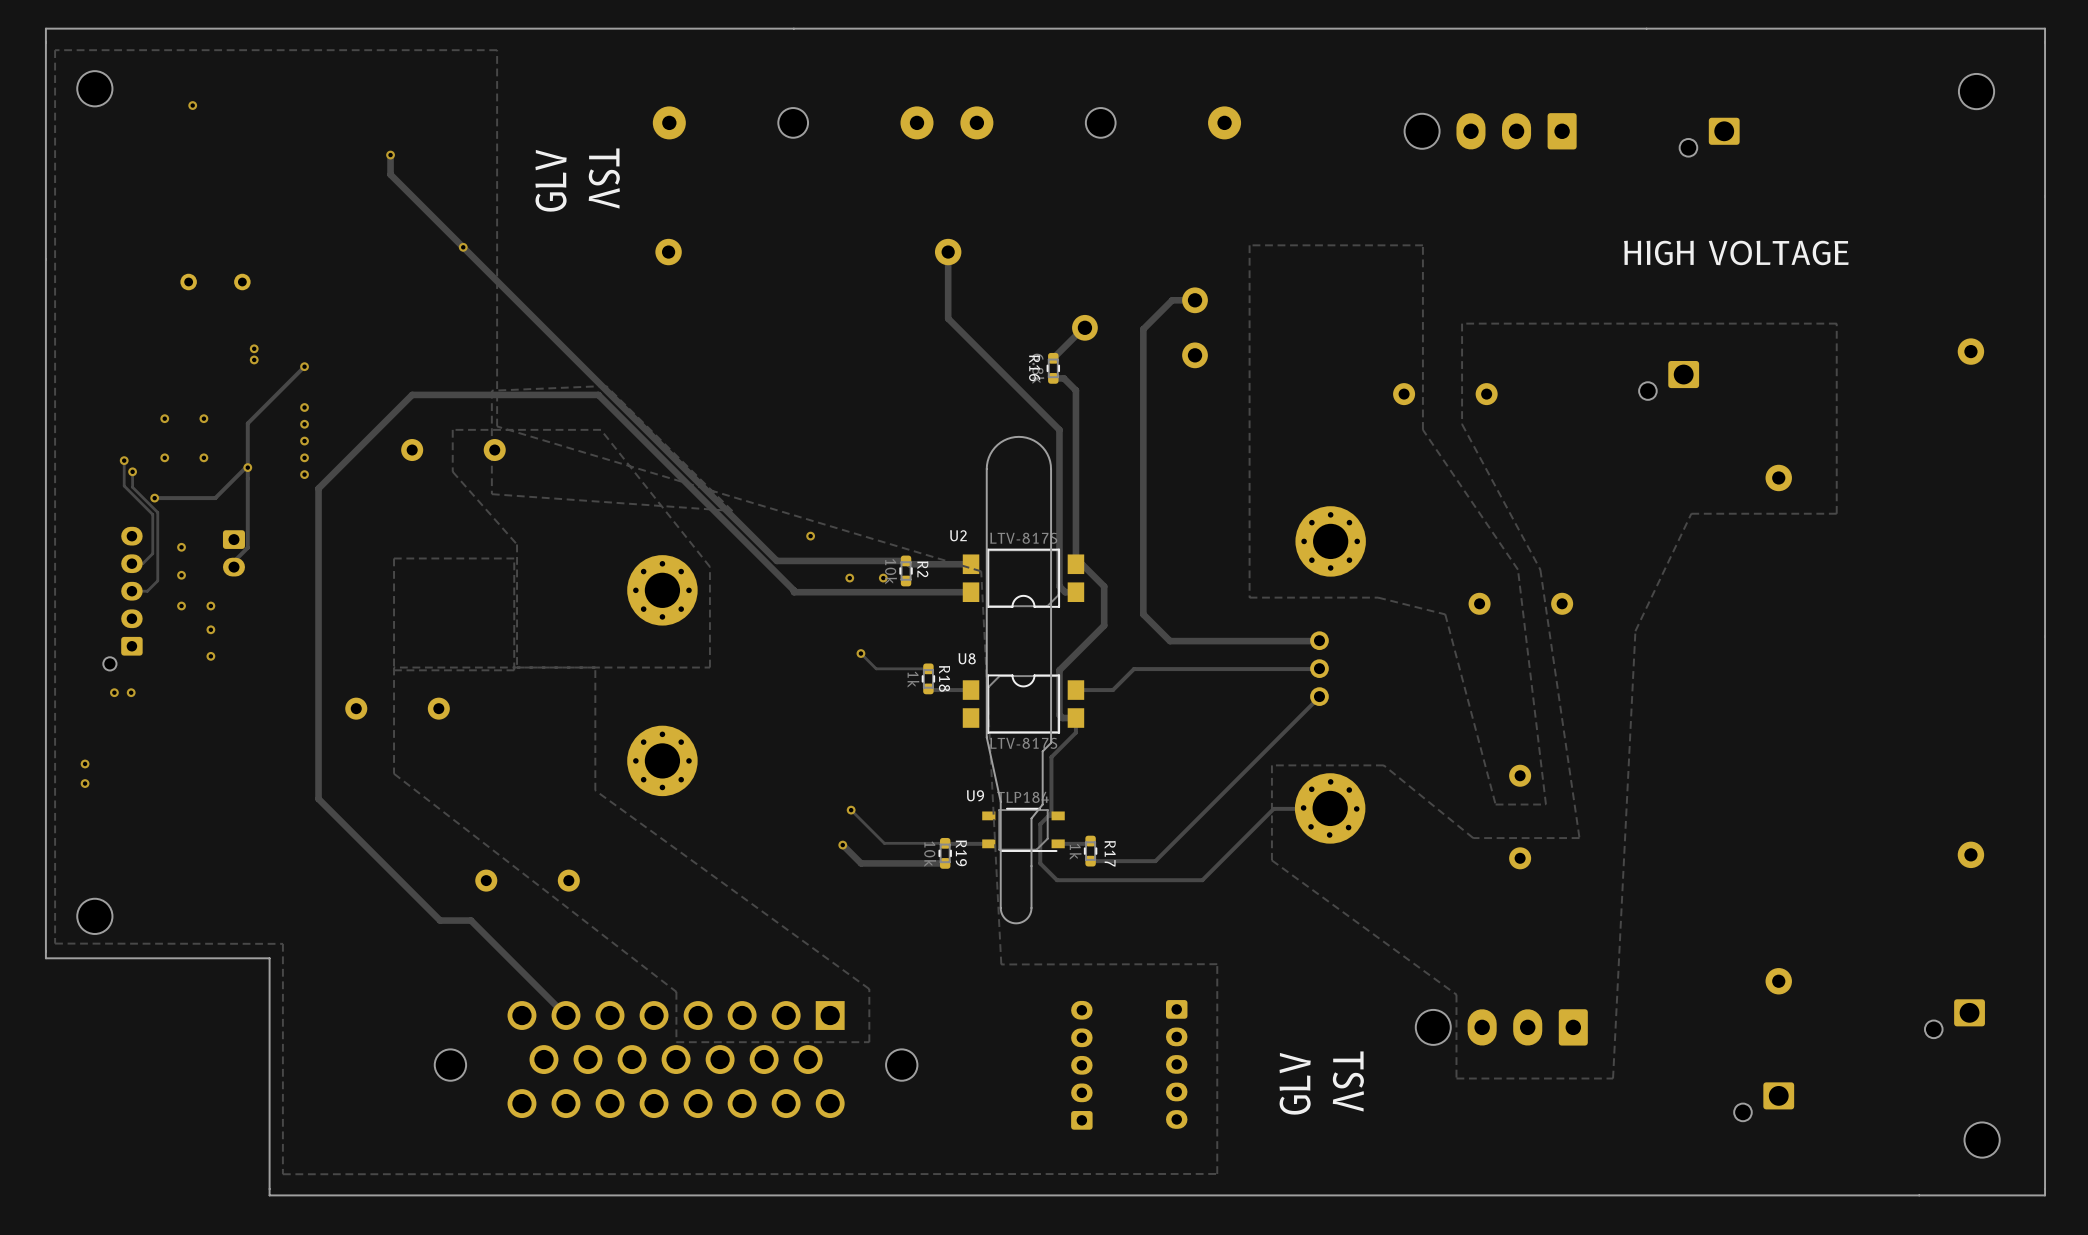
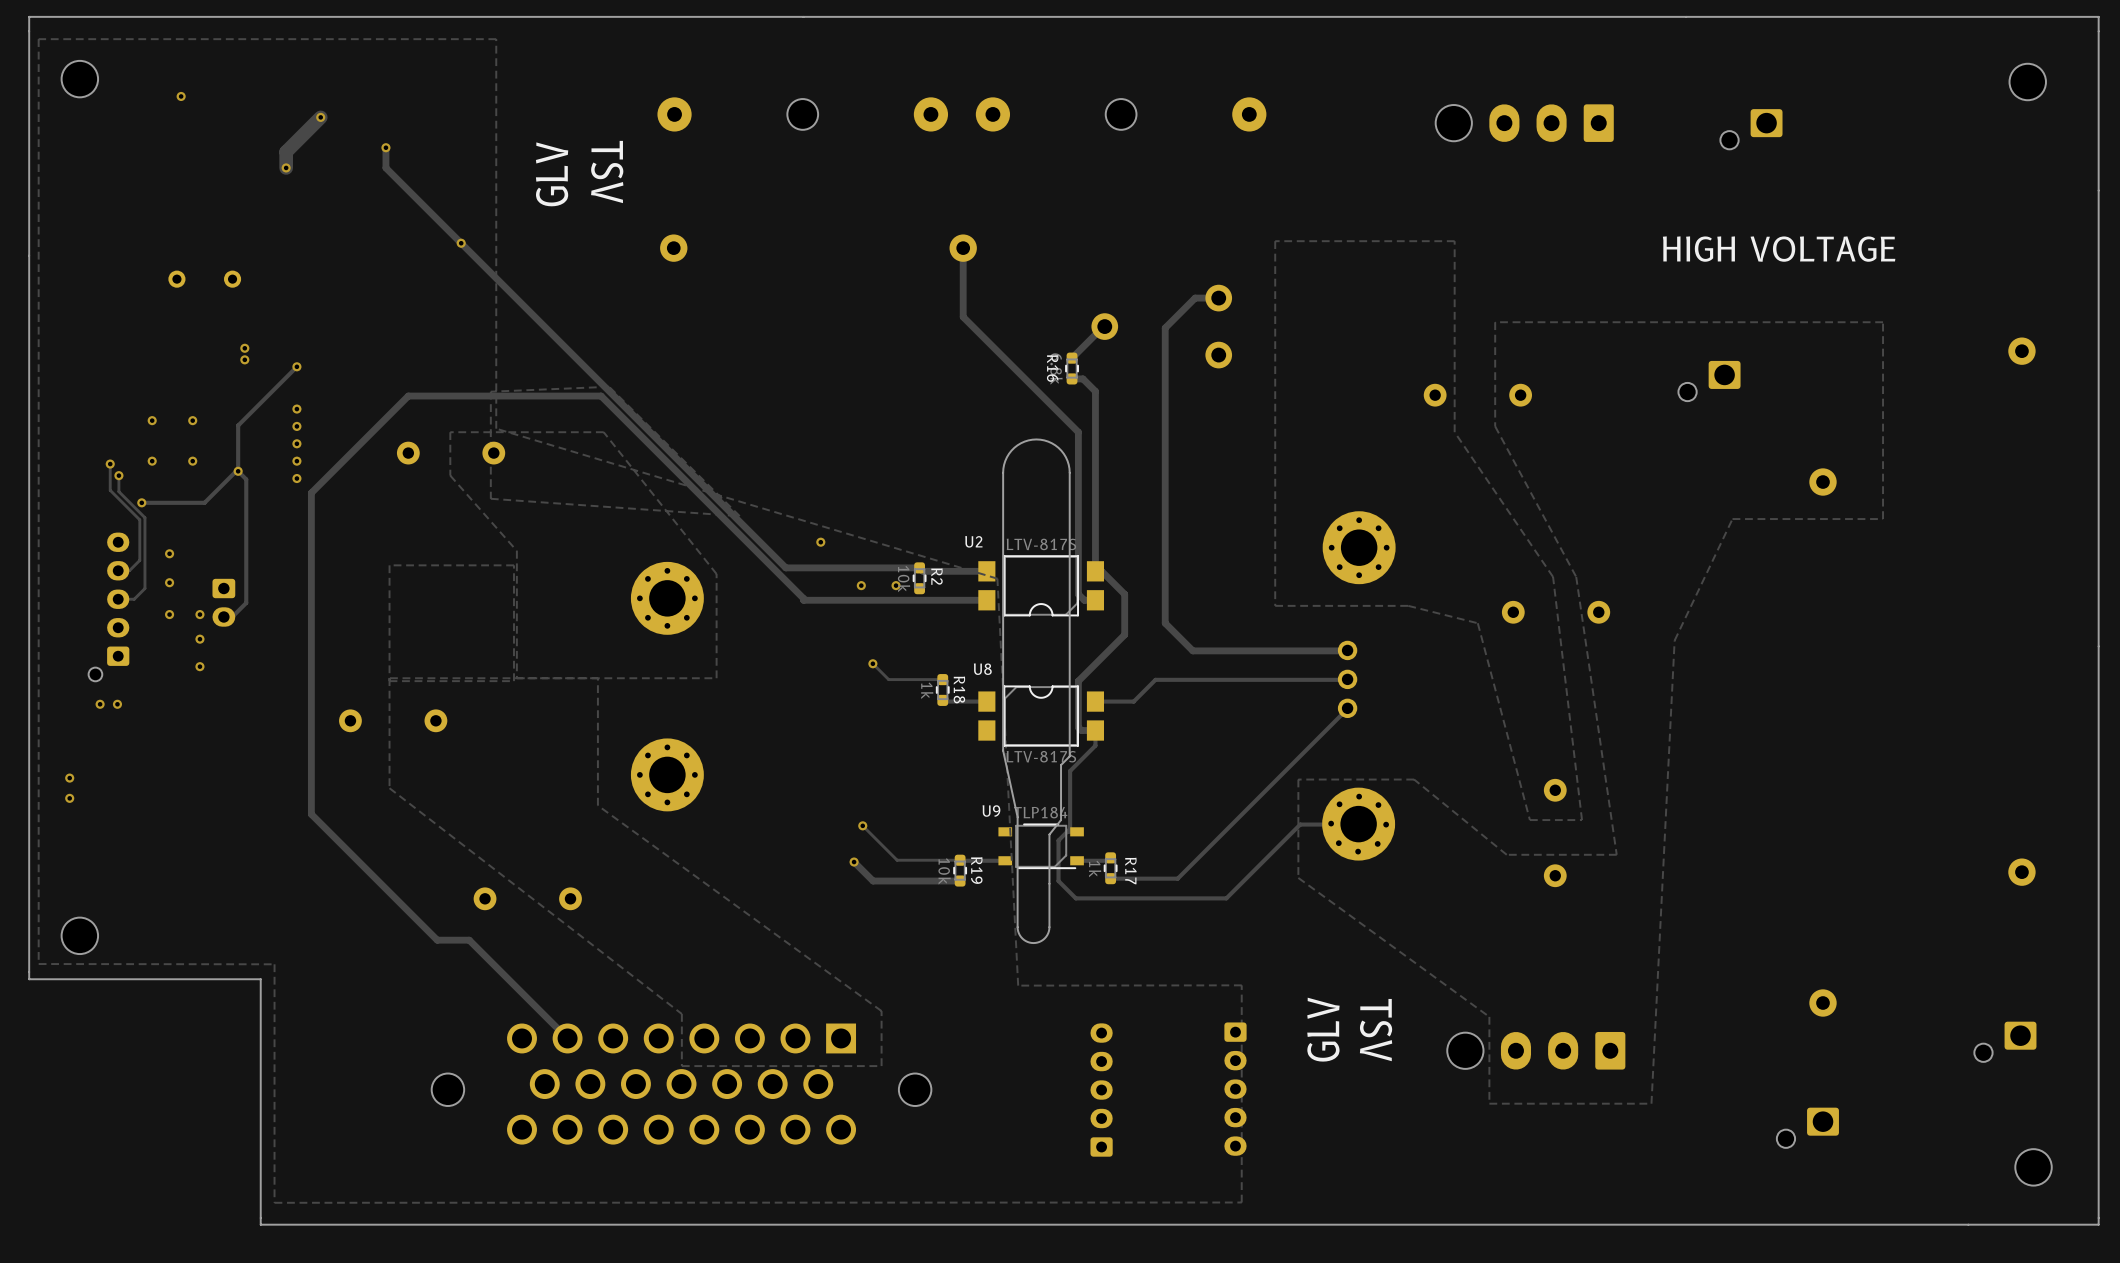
track: none -> (320, 117) (286, 151) (286, 167)
via: none -> (320, 117)
via: none -> (286, 167)
track: (247, 465) (247, 547) (233, 561) -> none
track: none -> (238, 471) (246, 479) (246, 602) (232, 616) (223, 616)
part position: (233, 553) -> (223, 602)
part position: (1176, 1064) -> (1235, 1089)
text position: TSV (1348, 1081) -> TSV (1376, 1030)
text position: GLV (1295, 1083) -> GLV (1323, 1029)

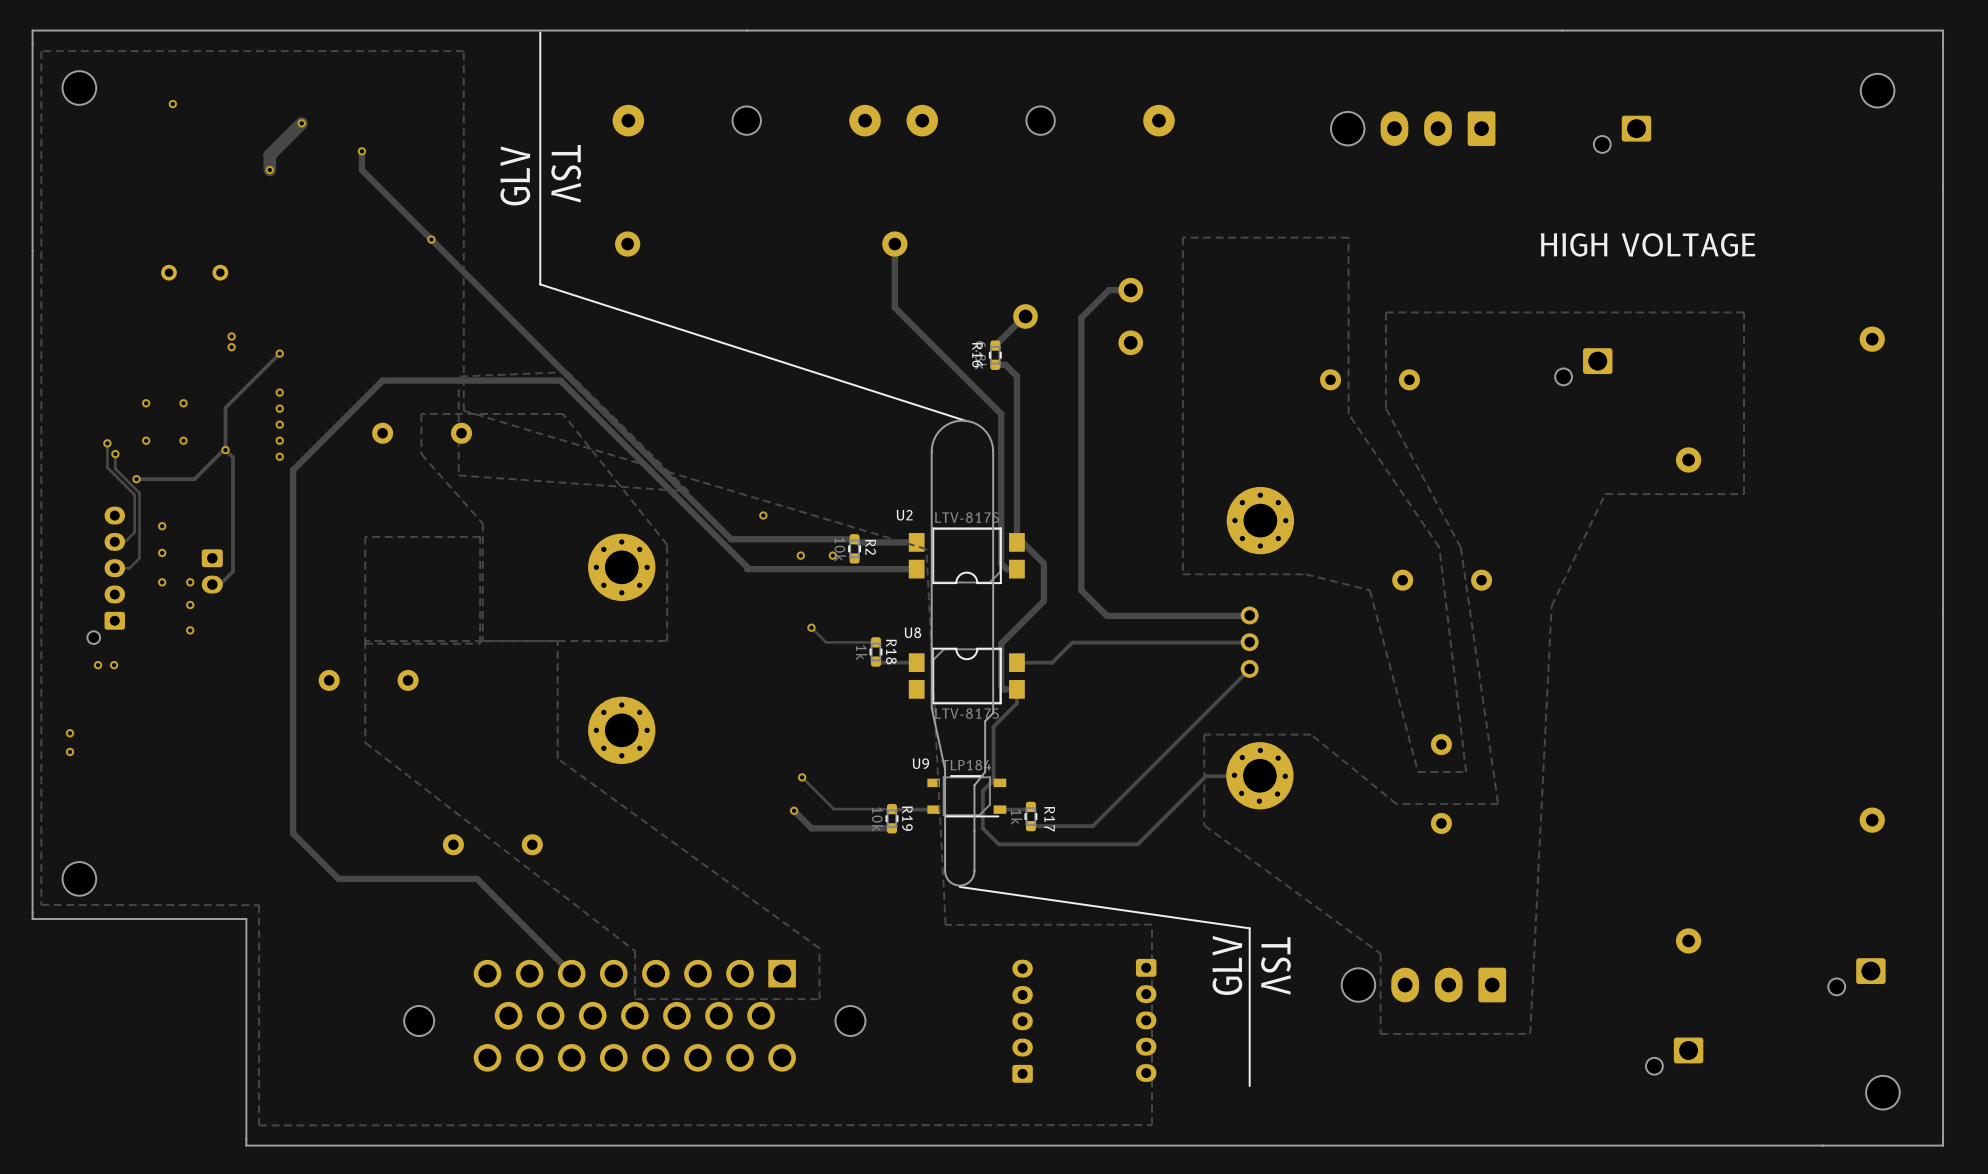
line: none -> (540, 32) (540, 284) (965, 420)
track: (311, 814) (437, 940) (469, 940) (567, 1038) -> (293, 766) (293, 833) (338, 878) (476, 878) (571, 973)
line: none -> (959, 886) (1249, 928) (1249, 1085)

